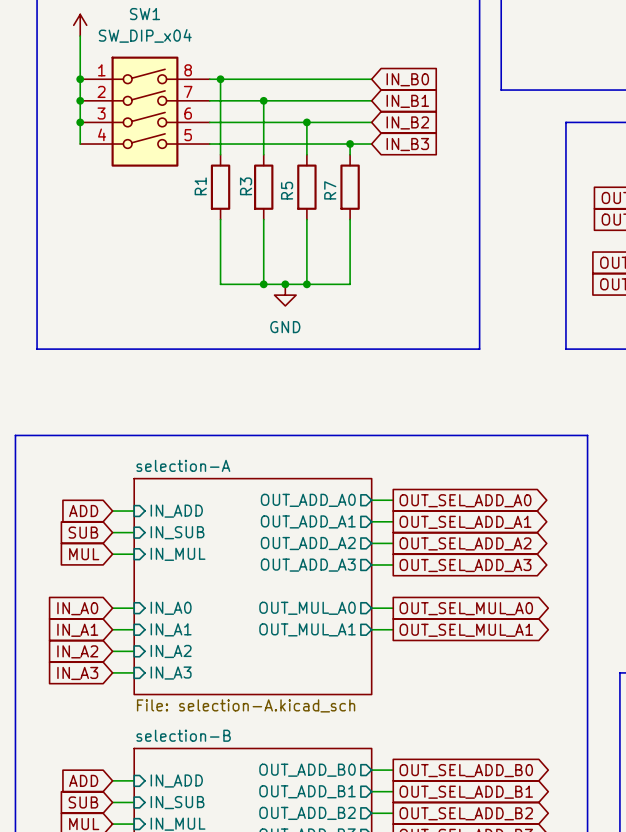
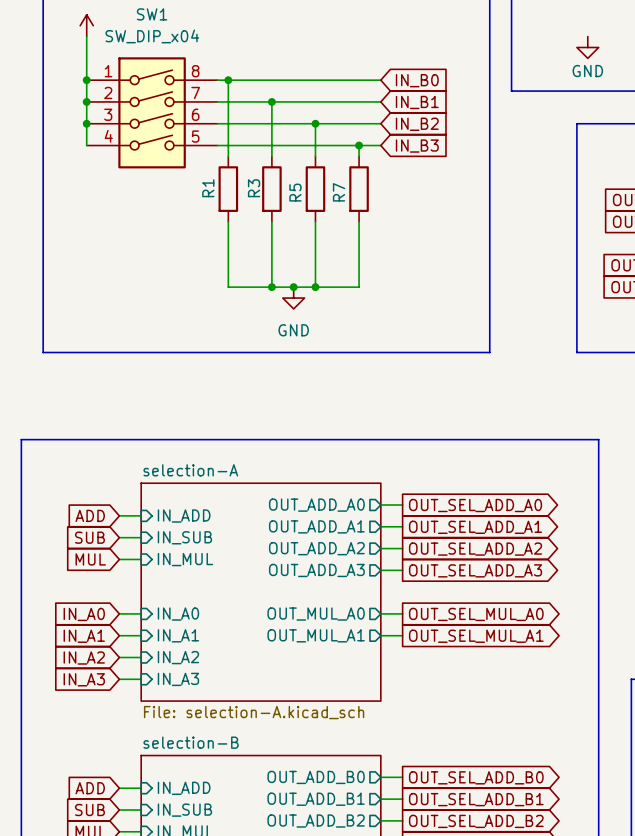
power symbol: none -> GND (587, 47)

